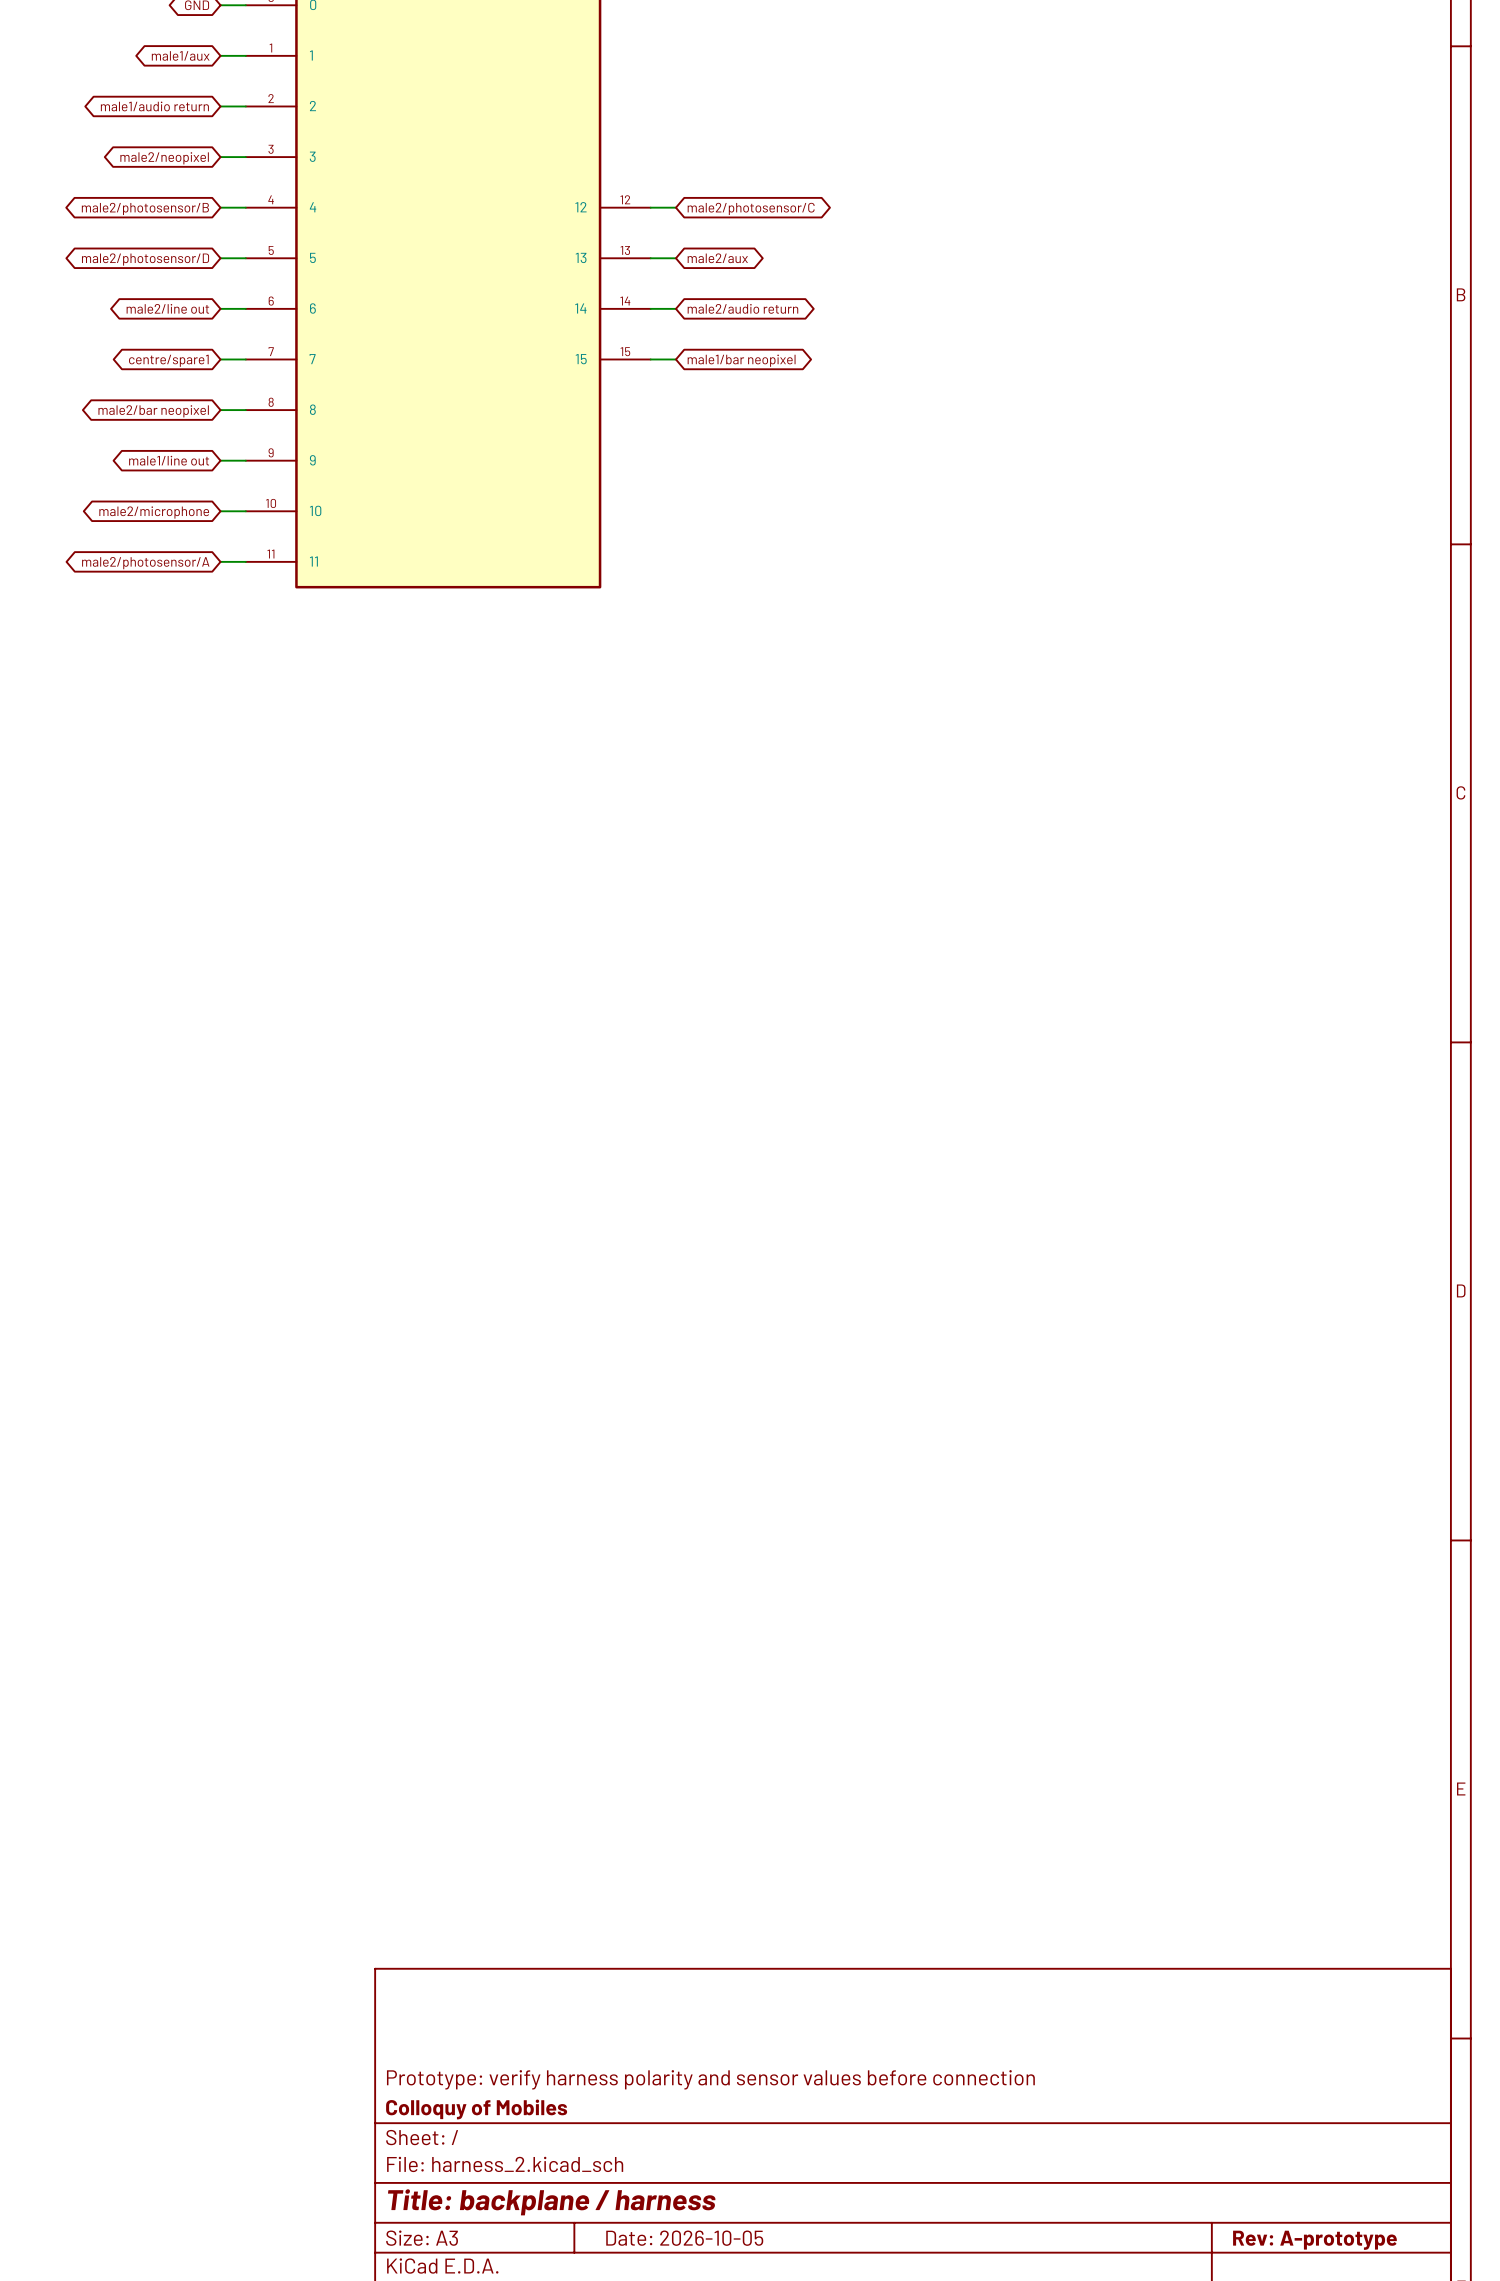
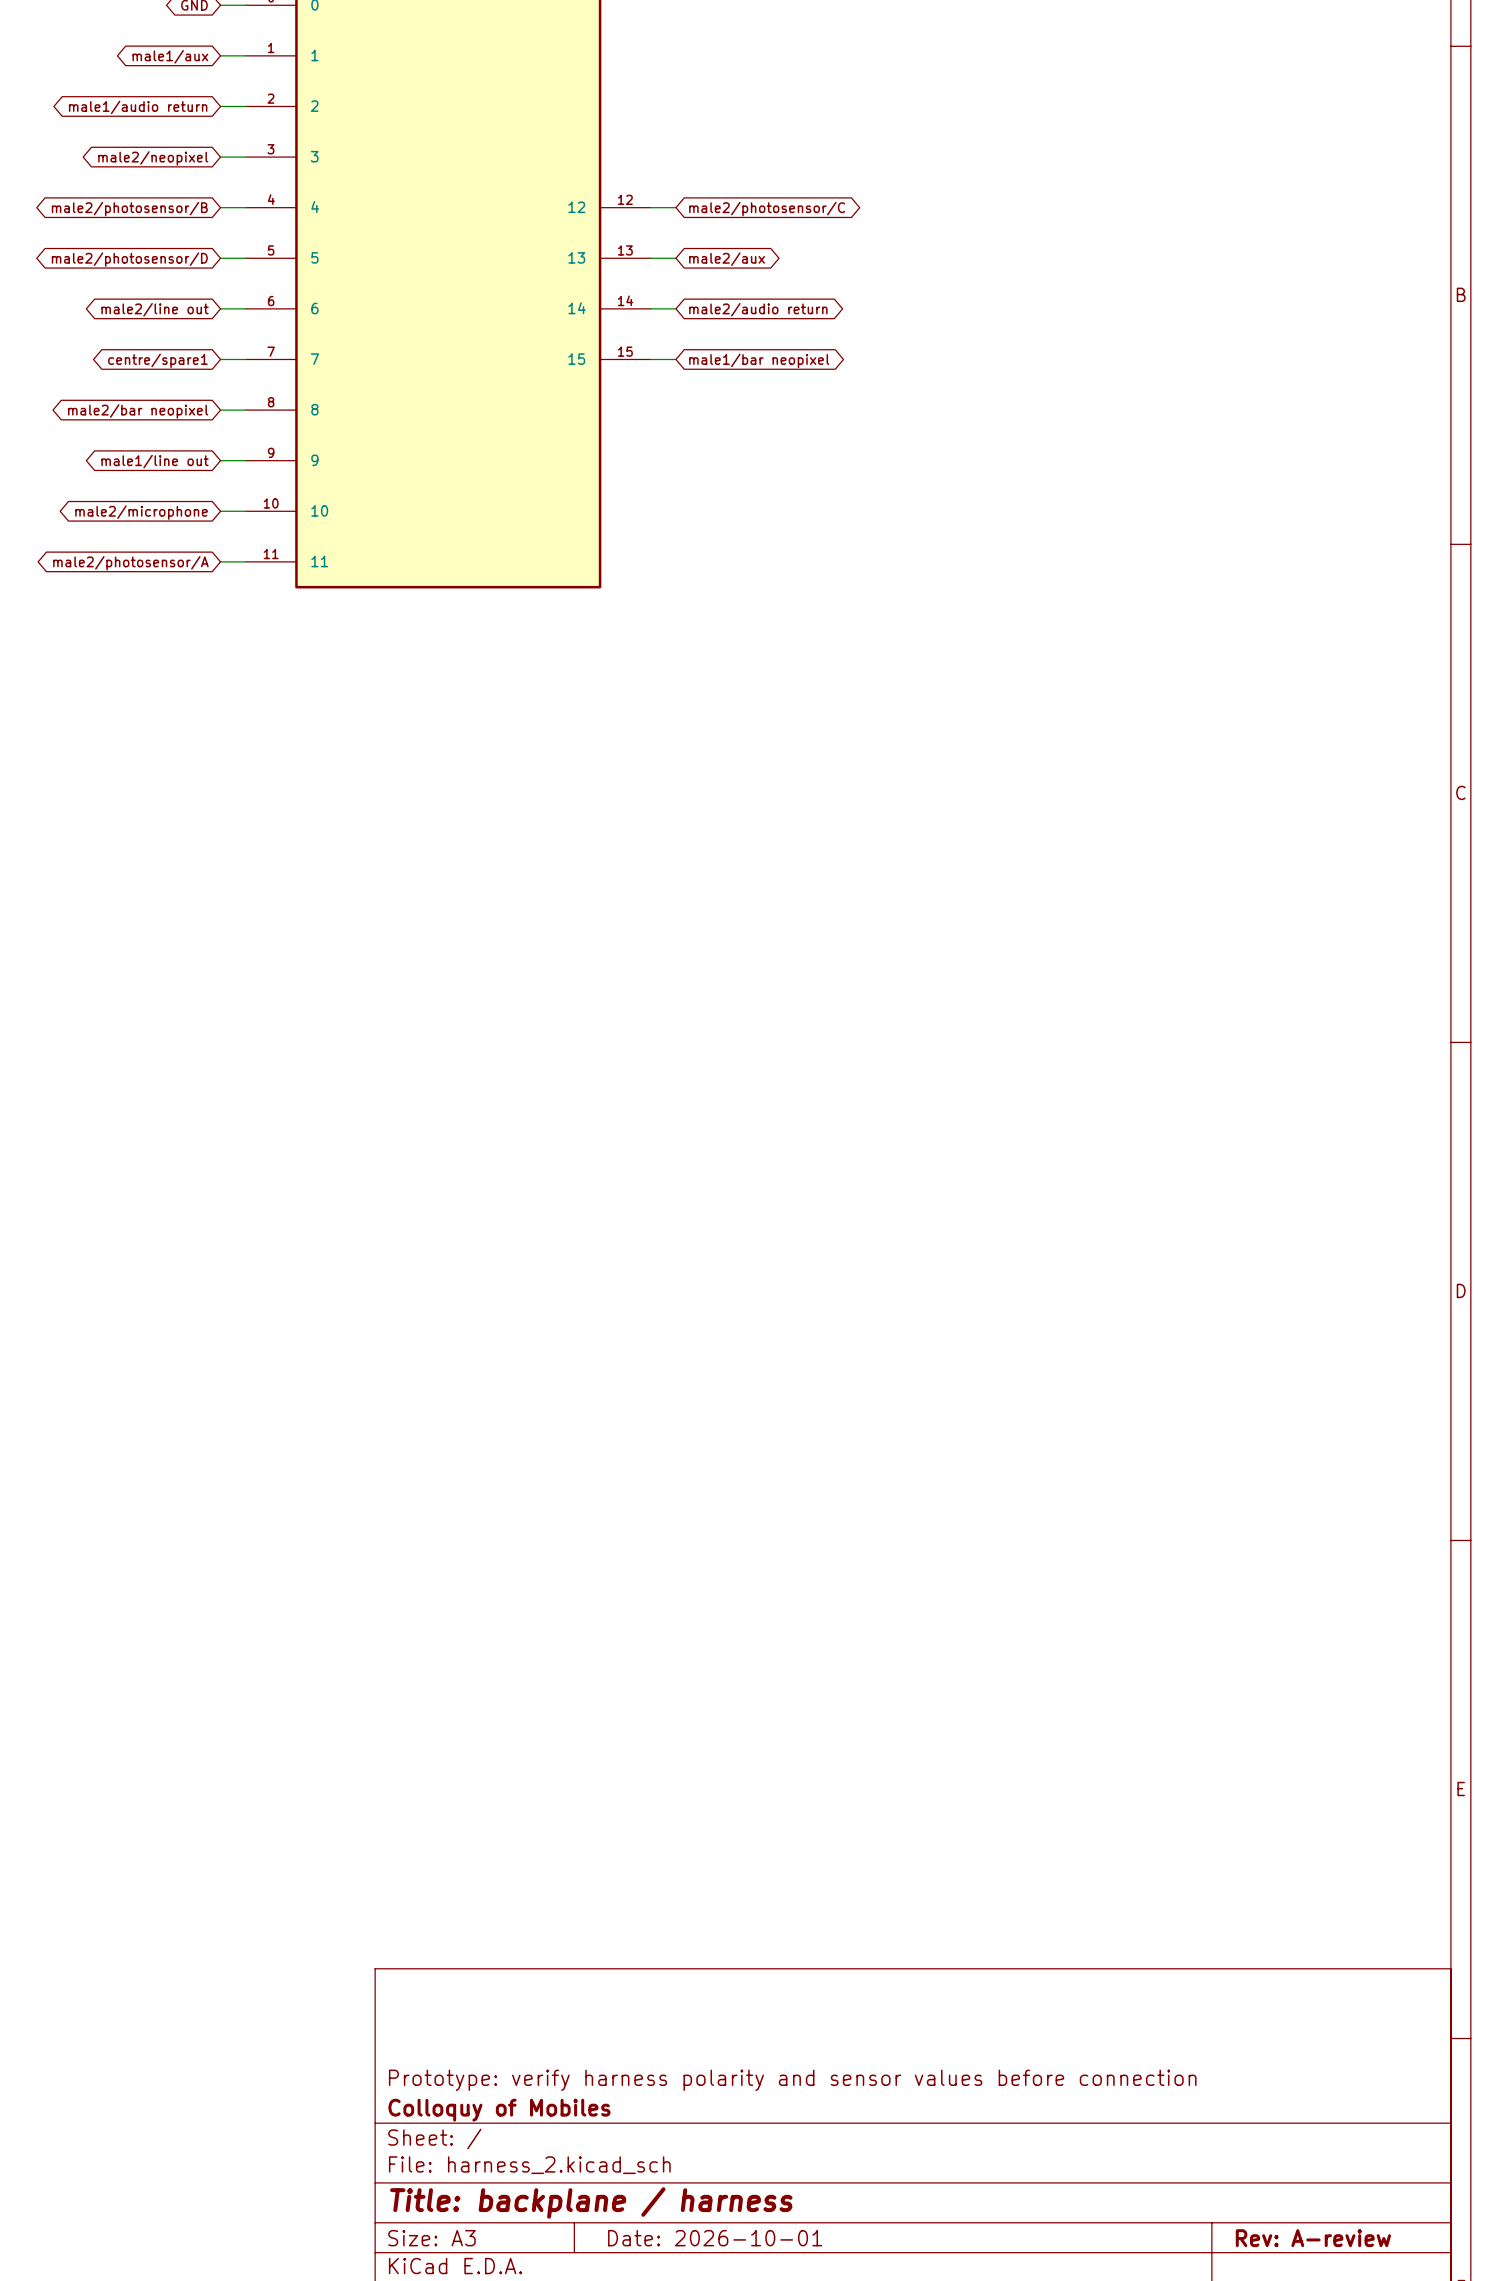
title block: Date: 2026-10-05 (684, 2238) -> Date: 2026-10-01 (715, 2238)
title block: Rev: A-prototype (1314, 2240) -> Rev: A-review (1313, 2238)

